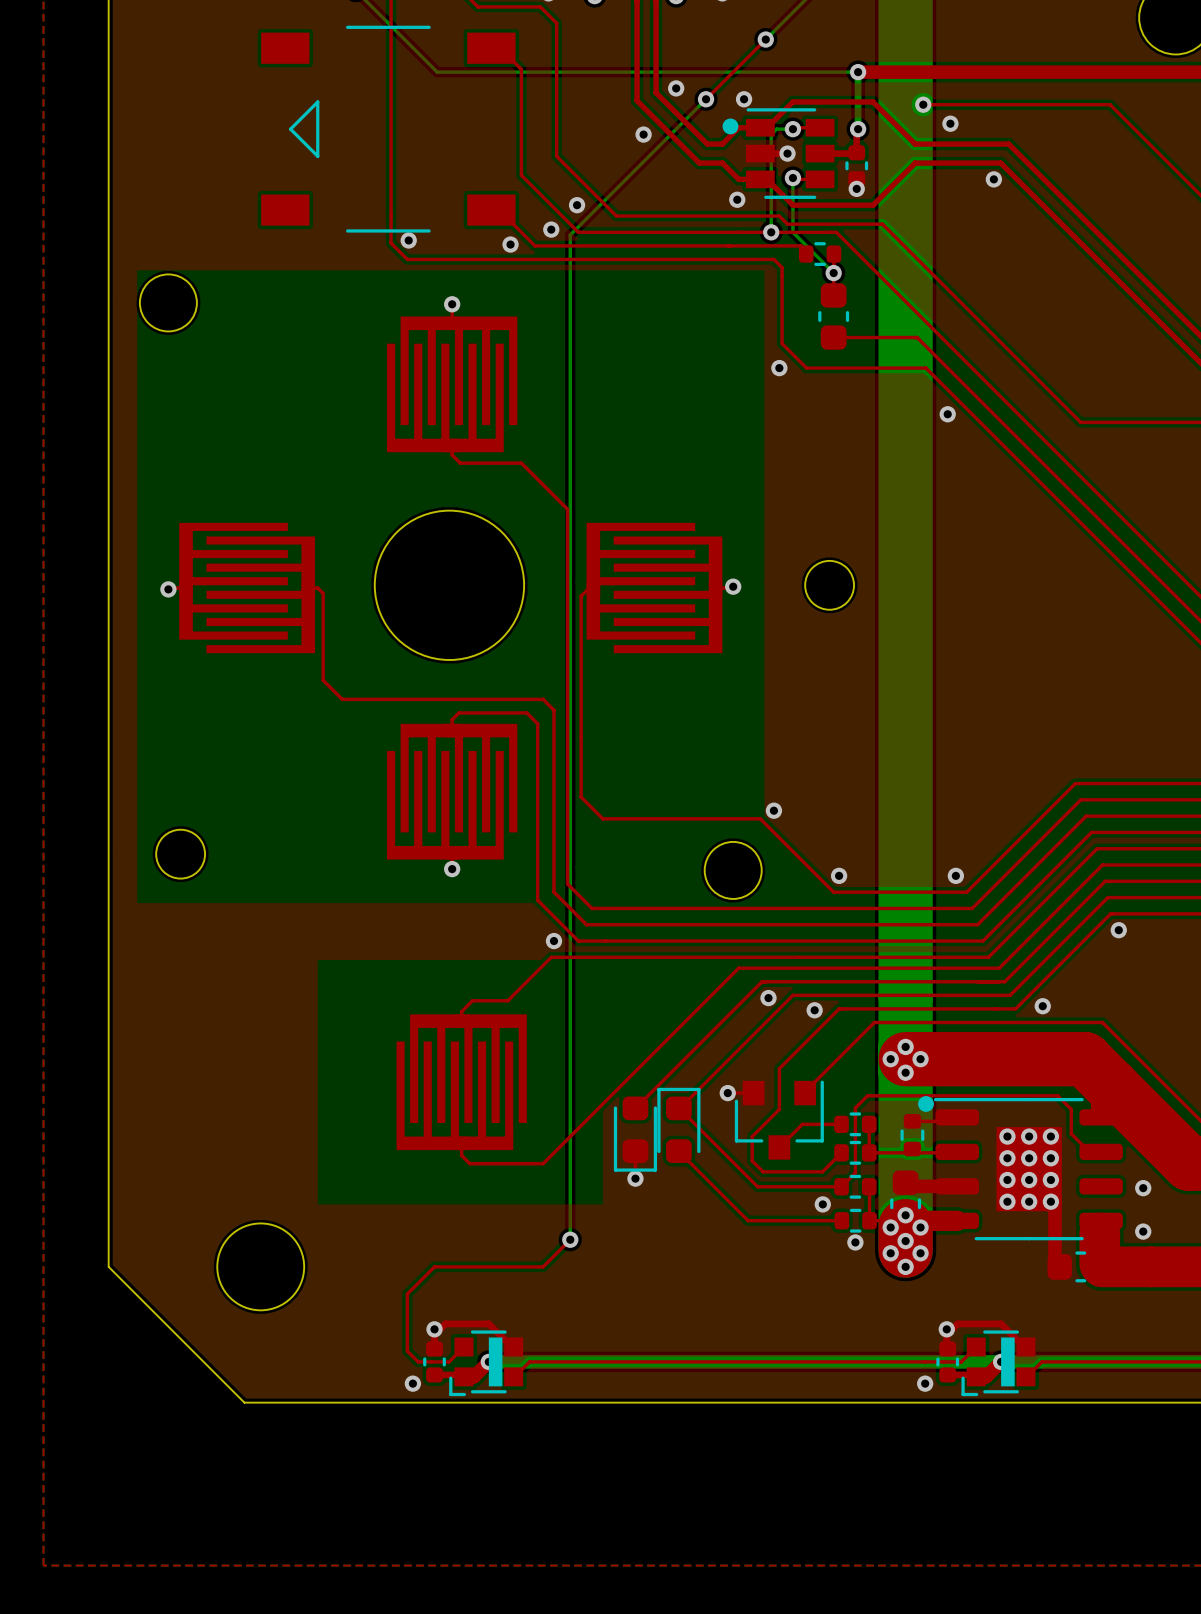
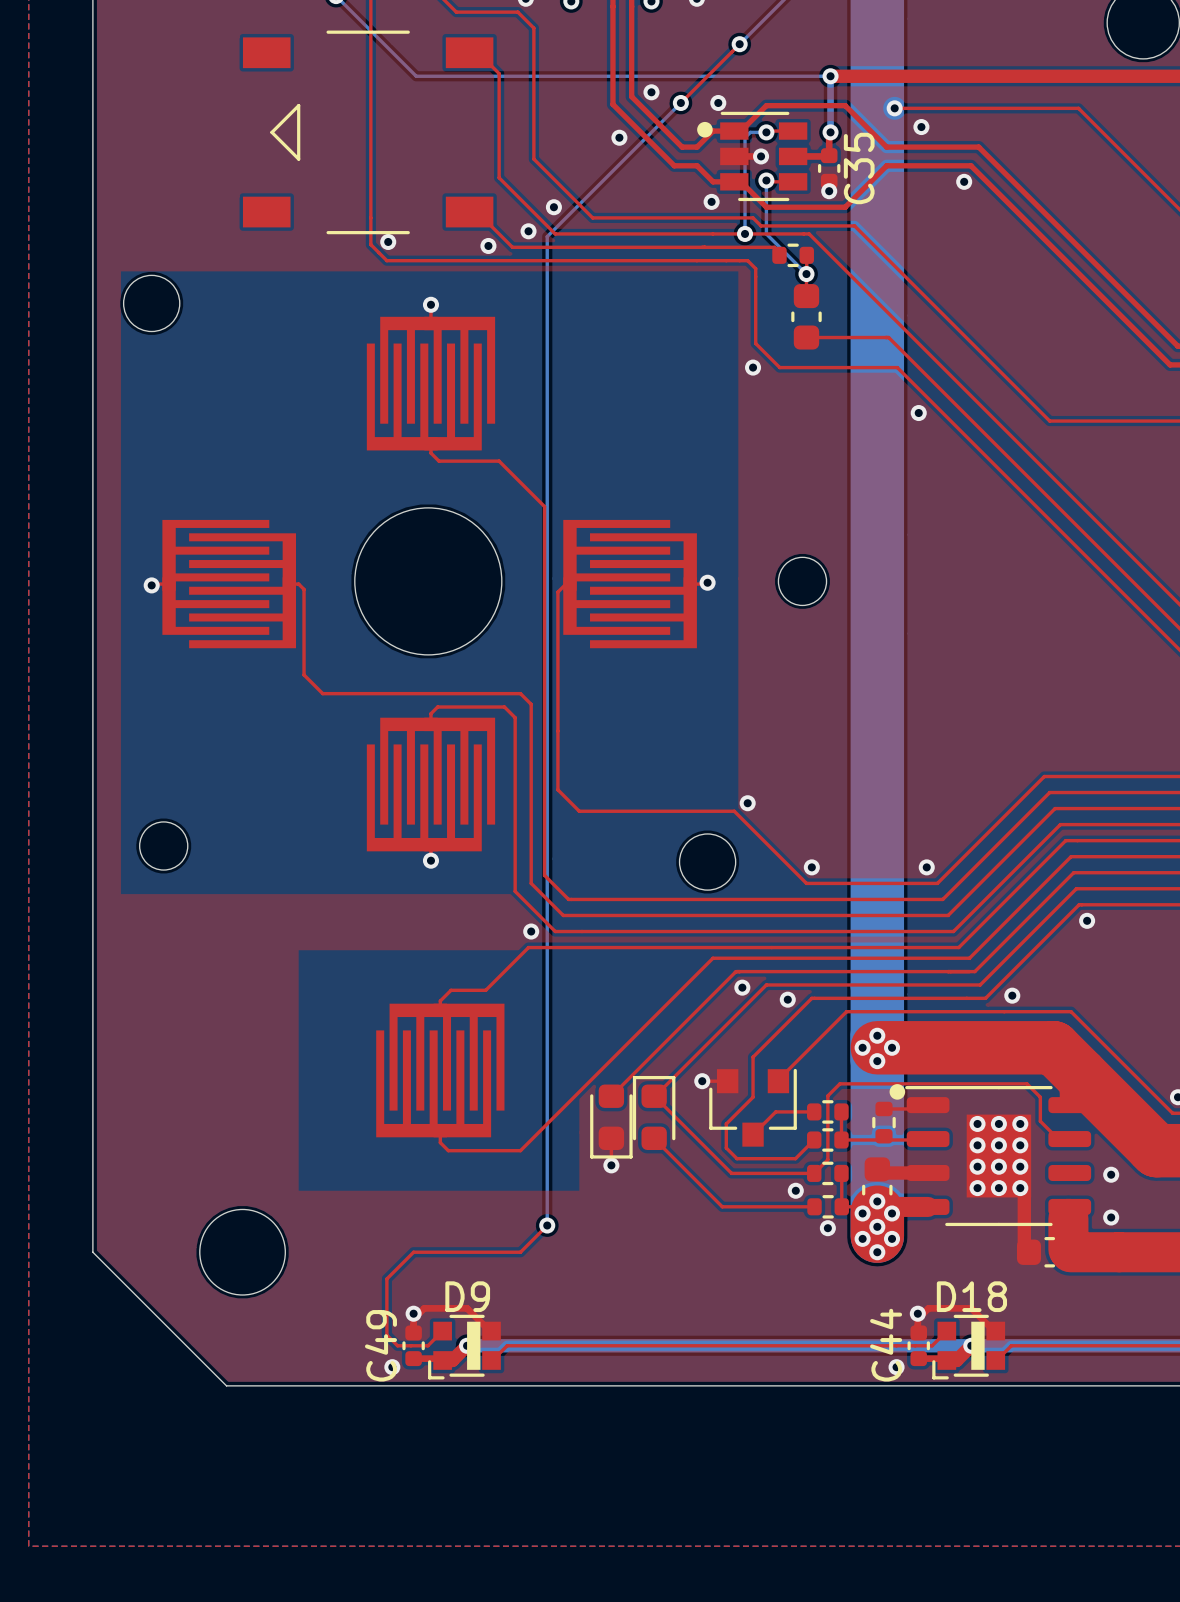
C35 name: none -> C35 (859, 168)
D9 name: none -> D9 (467, 1296)
D18 name: none -> D18 (971, 1296)
C49 name: none -> C49 (380, 1345)
C44 name: none -> C44 (886, 1345)

